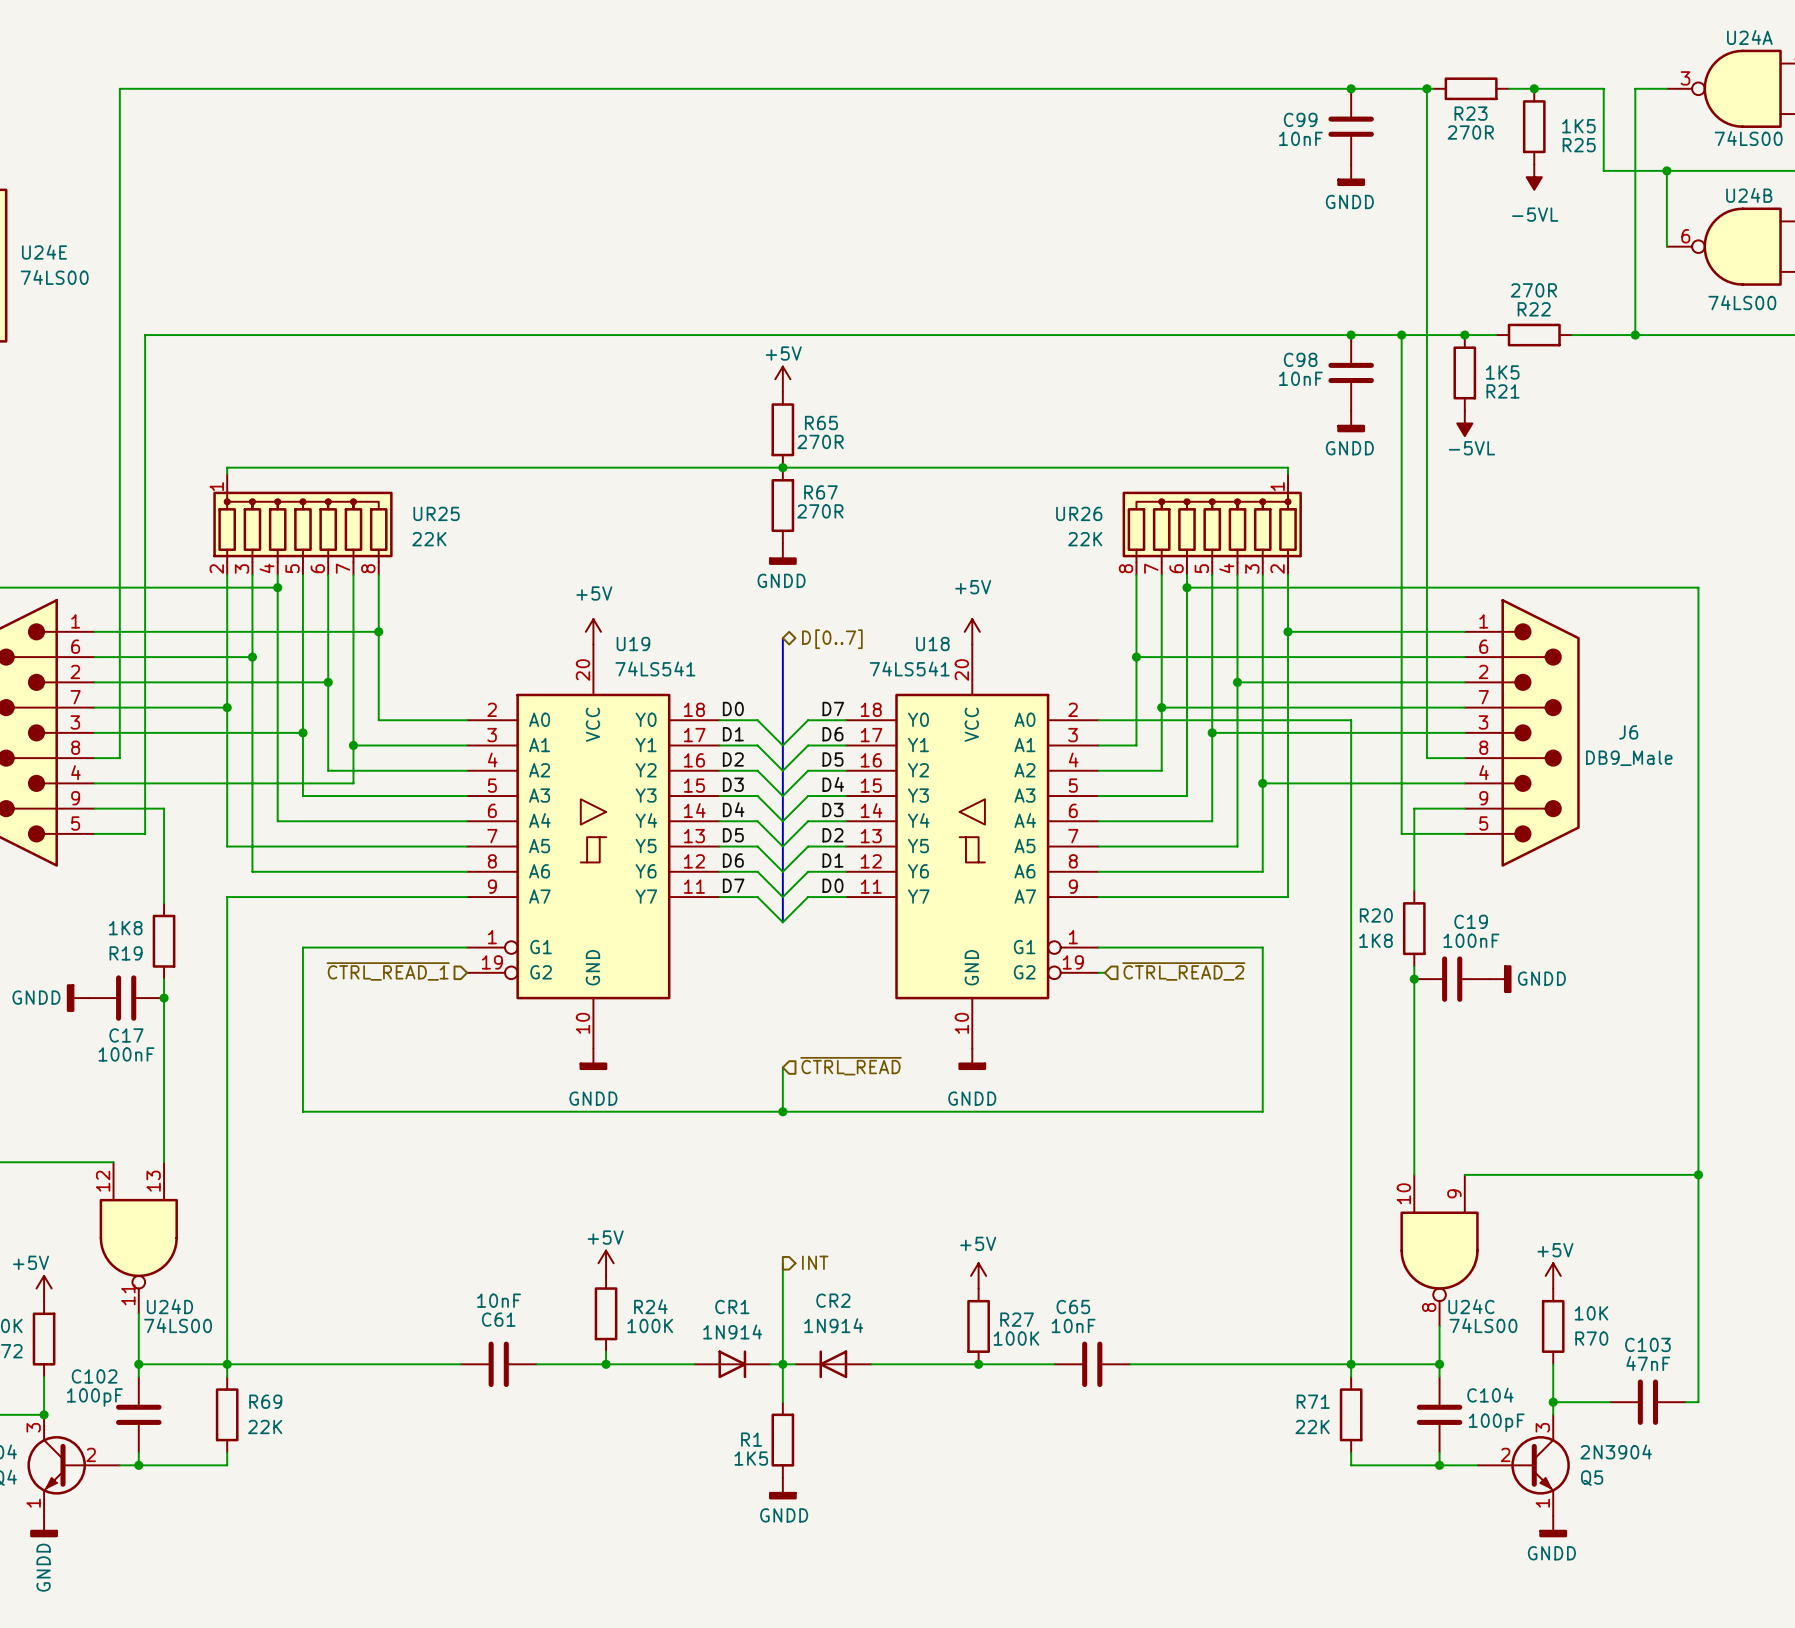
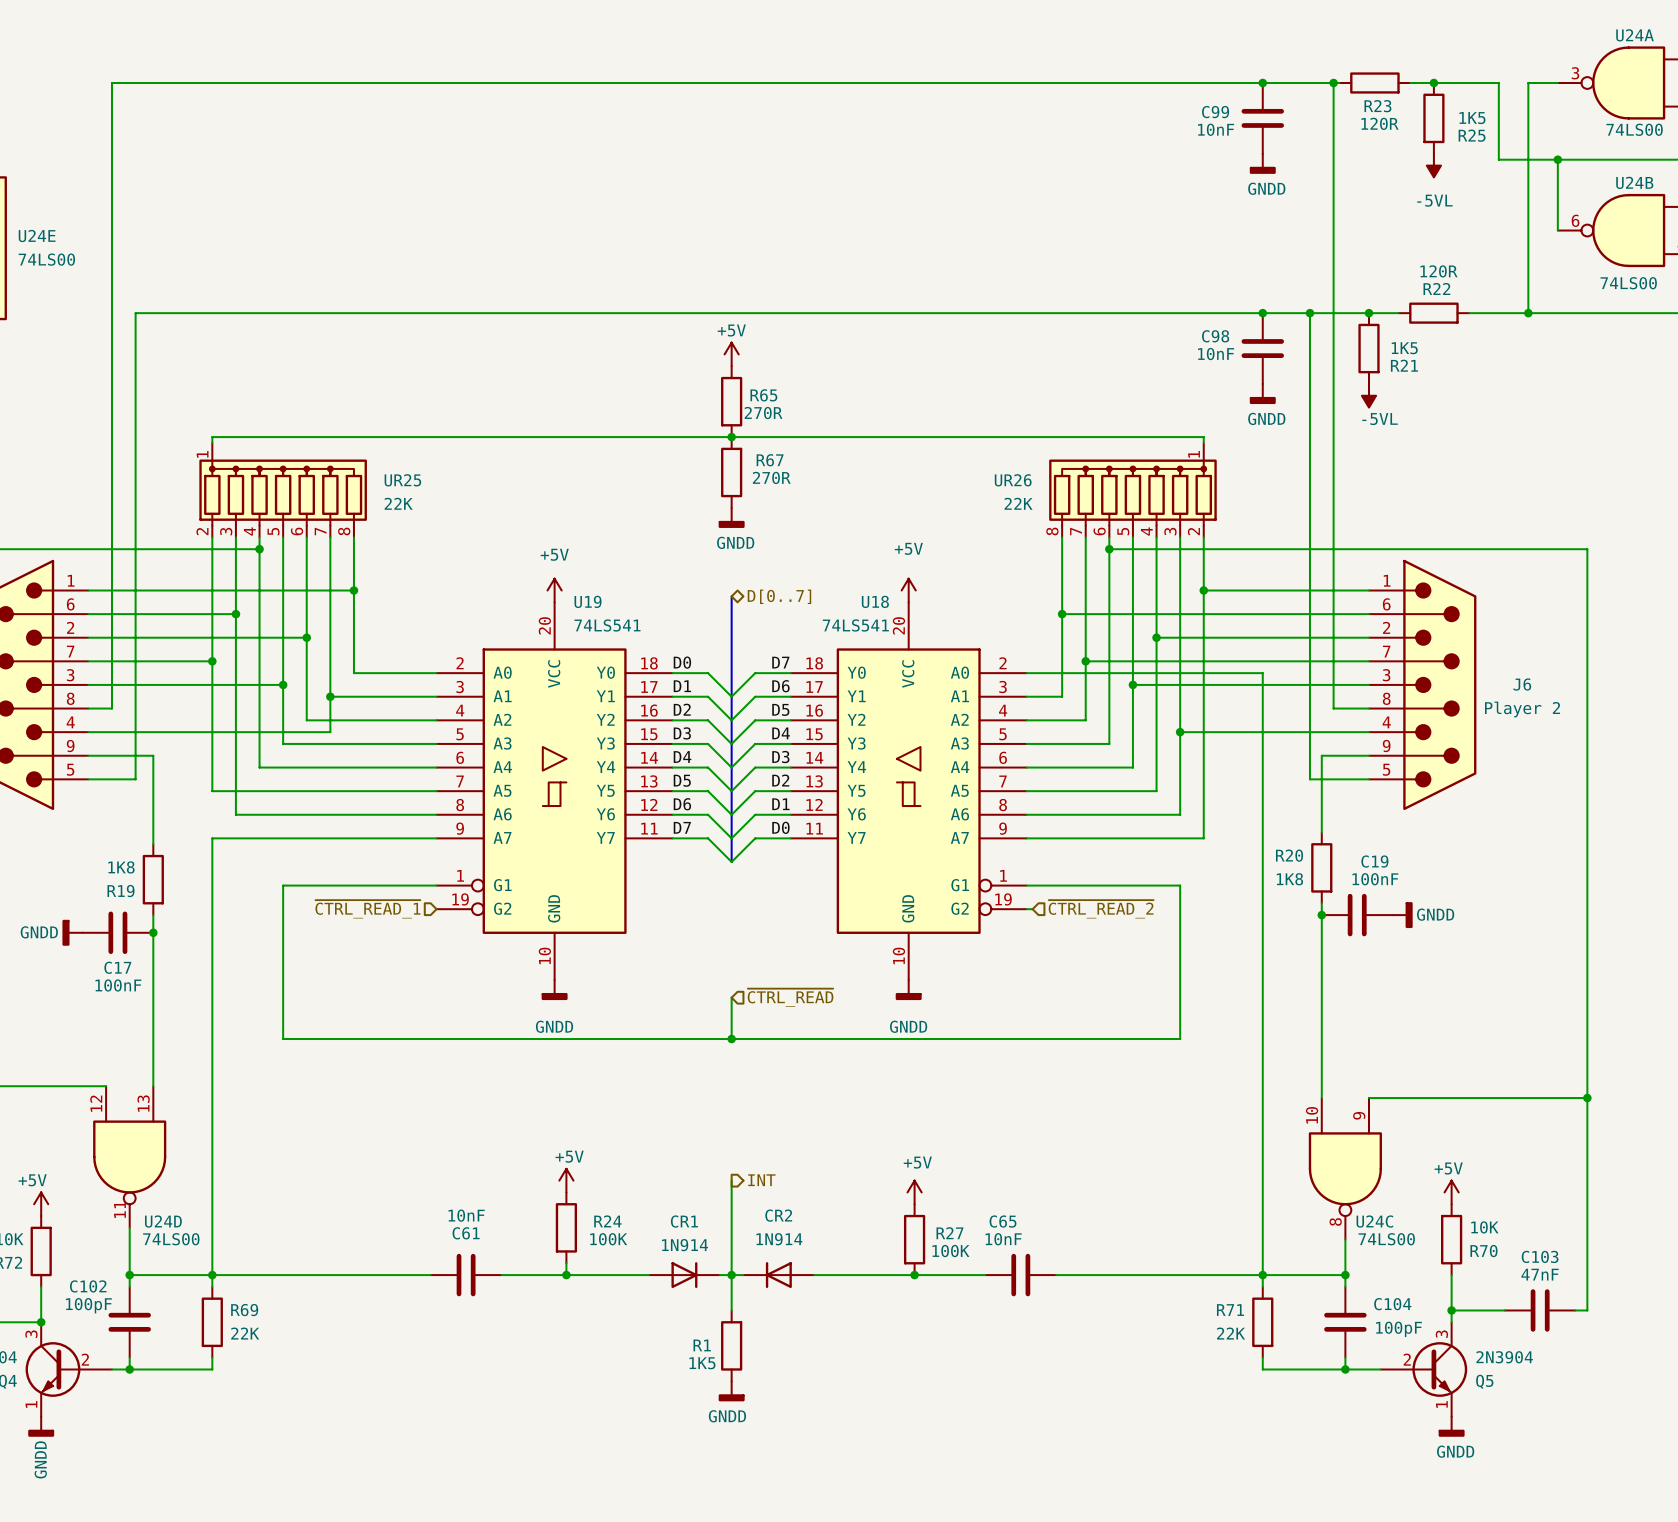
R23 value: 270R (1470, 132) -> 120R (1379, 123)
R22 value: 270R (1533, 290) -> 120R (1439, 271)
J6 value: DB9_Male (1629, 758) -> Player 2 (1522, 709)

